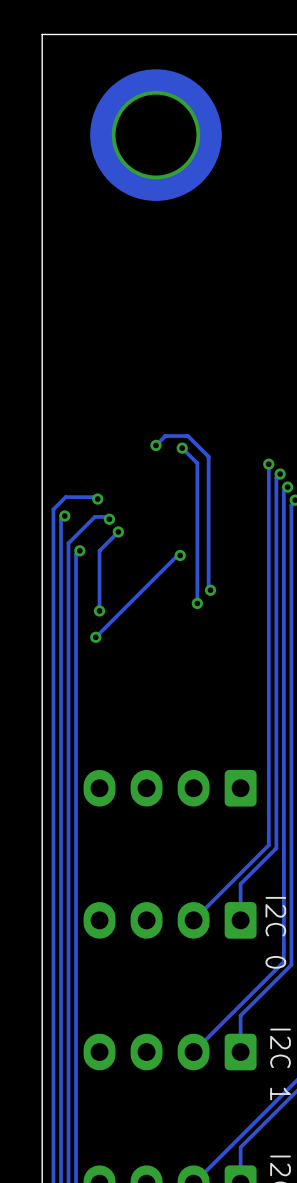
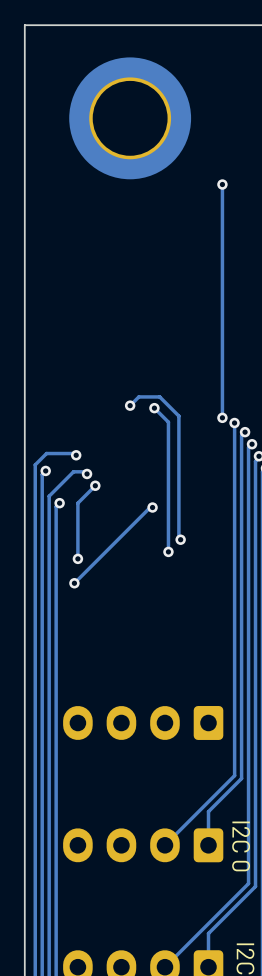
track: none -> (222, 184) (222, 417)
via: none -> (222, 184)
via: none -> (222, 417)

